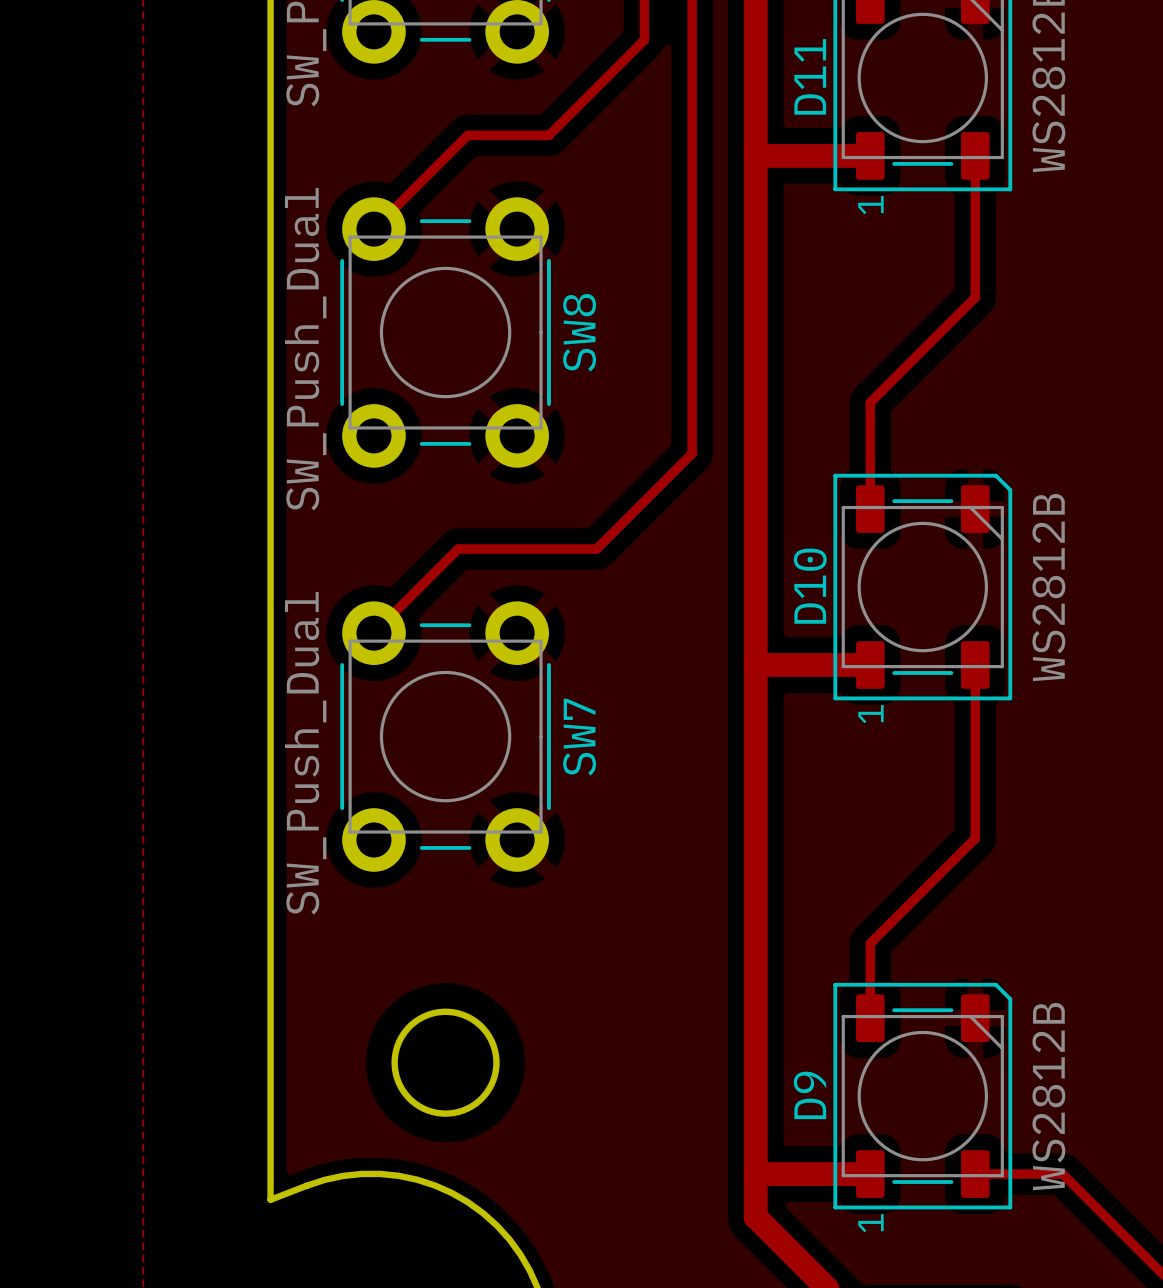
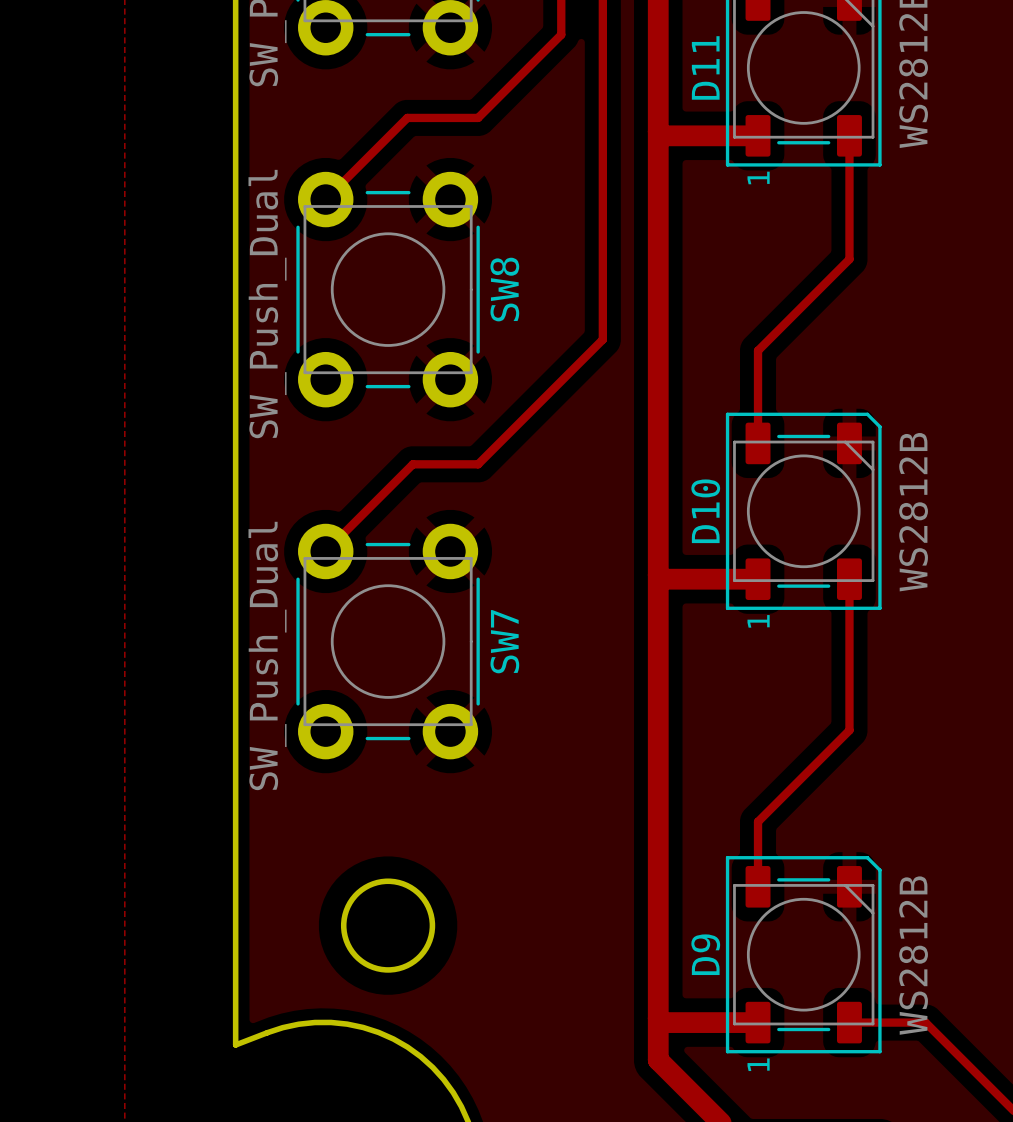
track: (692, 389) (692, 453) (596, 549) (458, 549) -> (602, 339) (478, 464) (412, 464) (399, 478)

